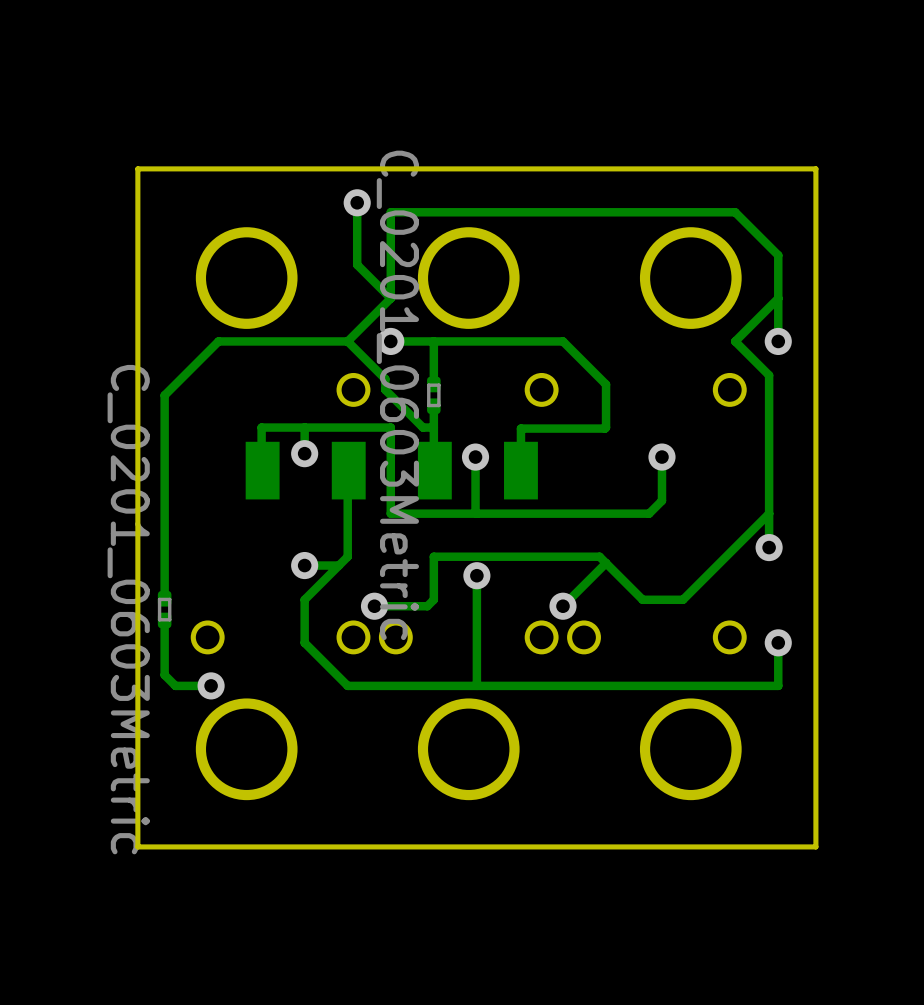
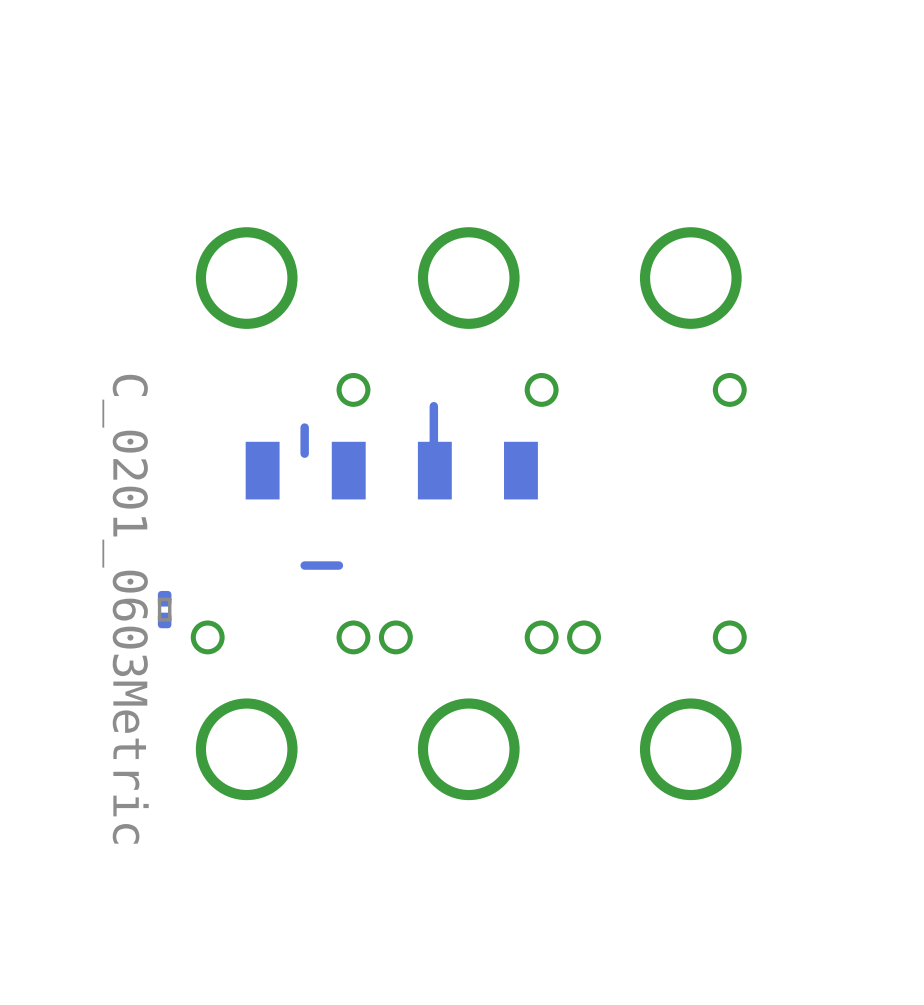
board edge: (815, 168) (137, 168) (137, 846) (815, 846) (815, 168) -> none
track: (357, 202) (357, 264) (390, 298) -> none
via: (357, 202) -> none
track: (390, 298) (390, 212) (735, 212) (778, 255) (778, 341) -> none
track: (390, 298) (347, 341) -> none
track: (778, 298) (735, 341) (769, 375) (769, 547) -> none
track: (347, 341) (218, 341) (164, 395) (164, 599) -> none
track: (347, 341) (385, 379) (385, 389) (422, 427) (433, 427) -> none
track: (390, 341) (562, 341) (606, 384) (606, 427) (520, 428) (520, 470) -> none
via: (390, 341) -> none
track: (433, 341) (433, 384) -> none
via: (778, 341) -> none
part: C_0201_0603Metric (433, 395) -> none
via: (304, 453) -> none
track: (475, 457) (476, 513) -> none
via: (475, 457) -> none
track: (661, 457) (661, 500) (649, 513) (390, 513) (390, 427) (261, 427) (261, 470) -> none
via: (661, 457) -> none
track: (347, 470) (347, 556) (304, 599) (304, 642) (347, 685) (778, 685) (778, 642) -> none
track: (769, 513) (683, 599) (642, 599) (599, 556) (433, 556) (433, 599) (427, 606) (373, 606) -> none
via: (769, 547) -> none
track: (606, 563) (562, 606) -> none
via: (304, 565) -> none
track: (476, 575) (476, 685) -> none
via: (476, 575) -> none
via: (374, 606) -> none
via: (562, 606) -> none
track: (164, 620) (164, 675) (175, 685) (211, 685) -> none
via: (778, 642) -> none
via: (211, 685) -> none

